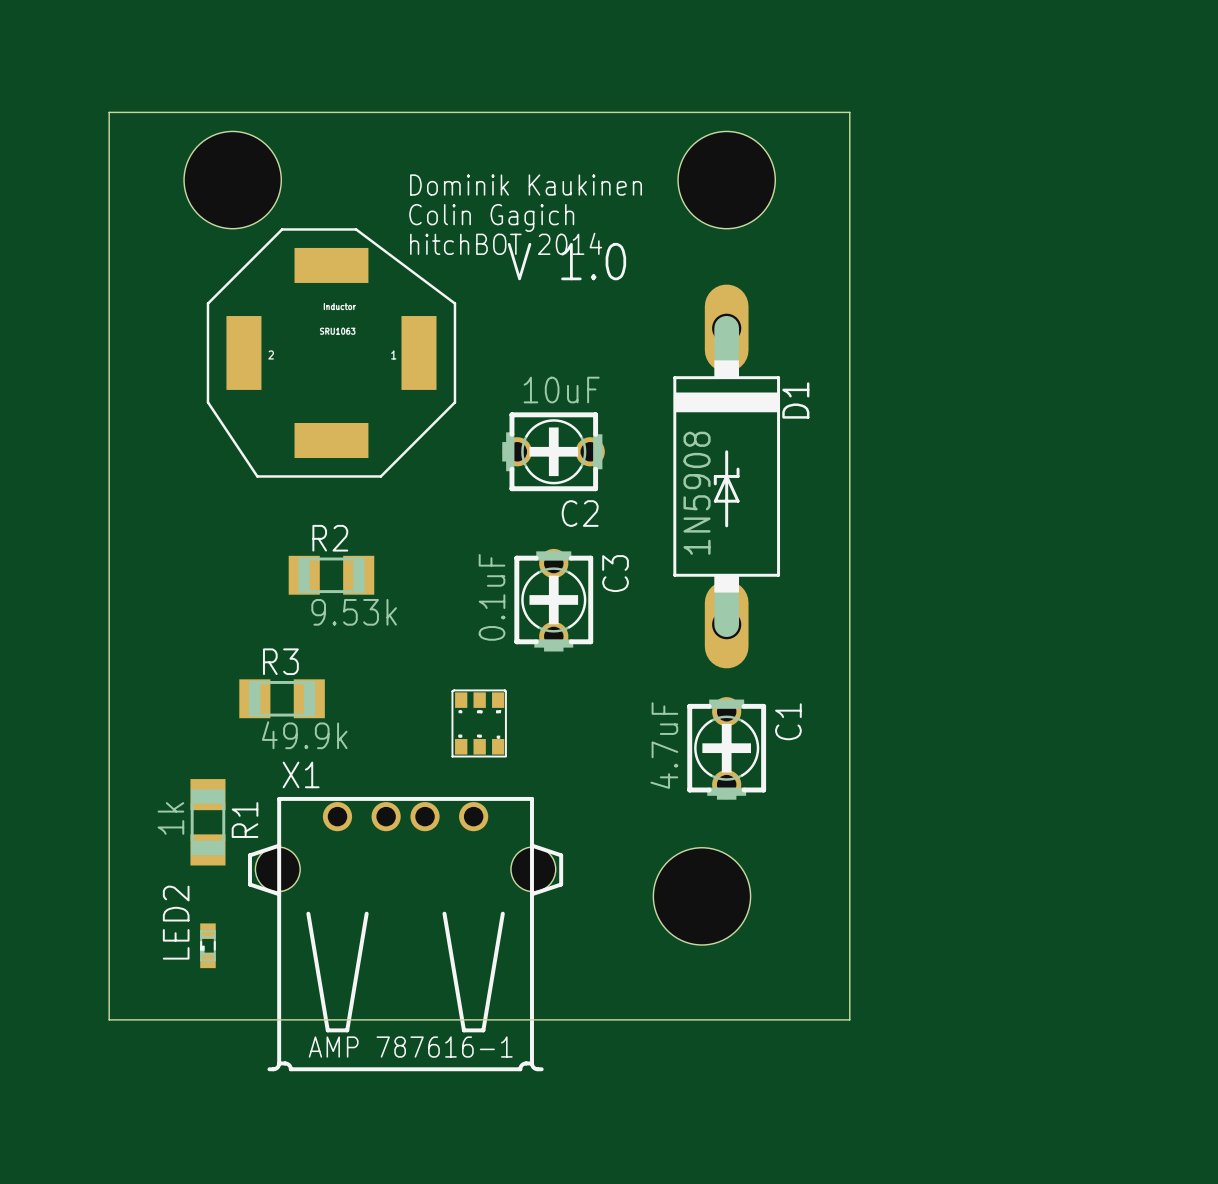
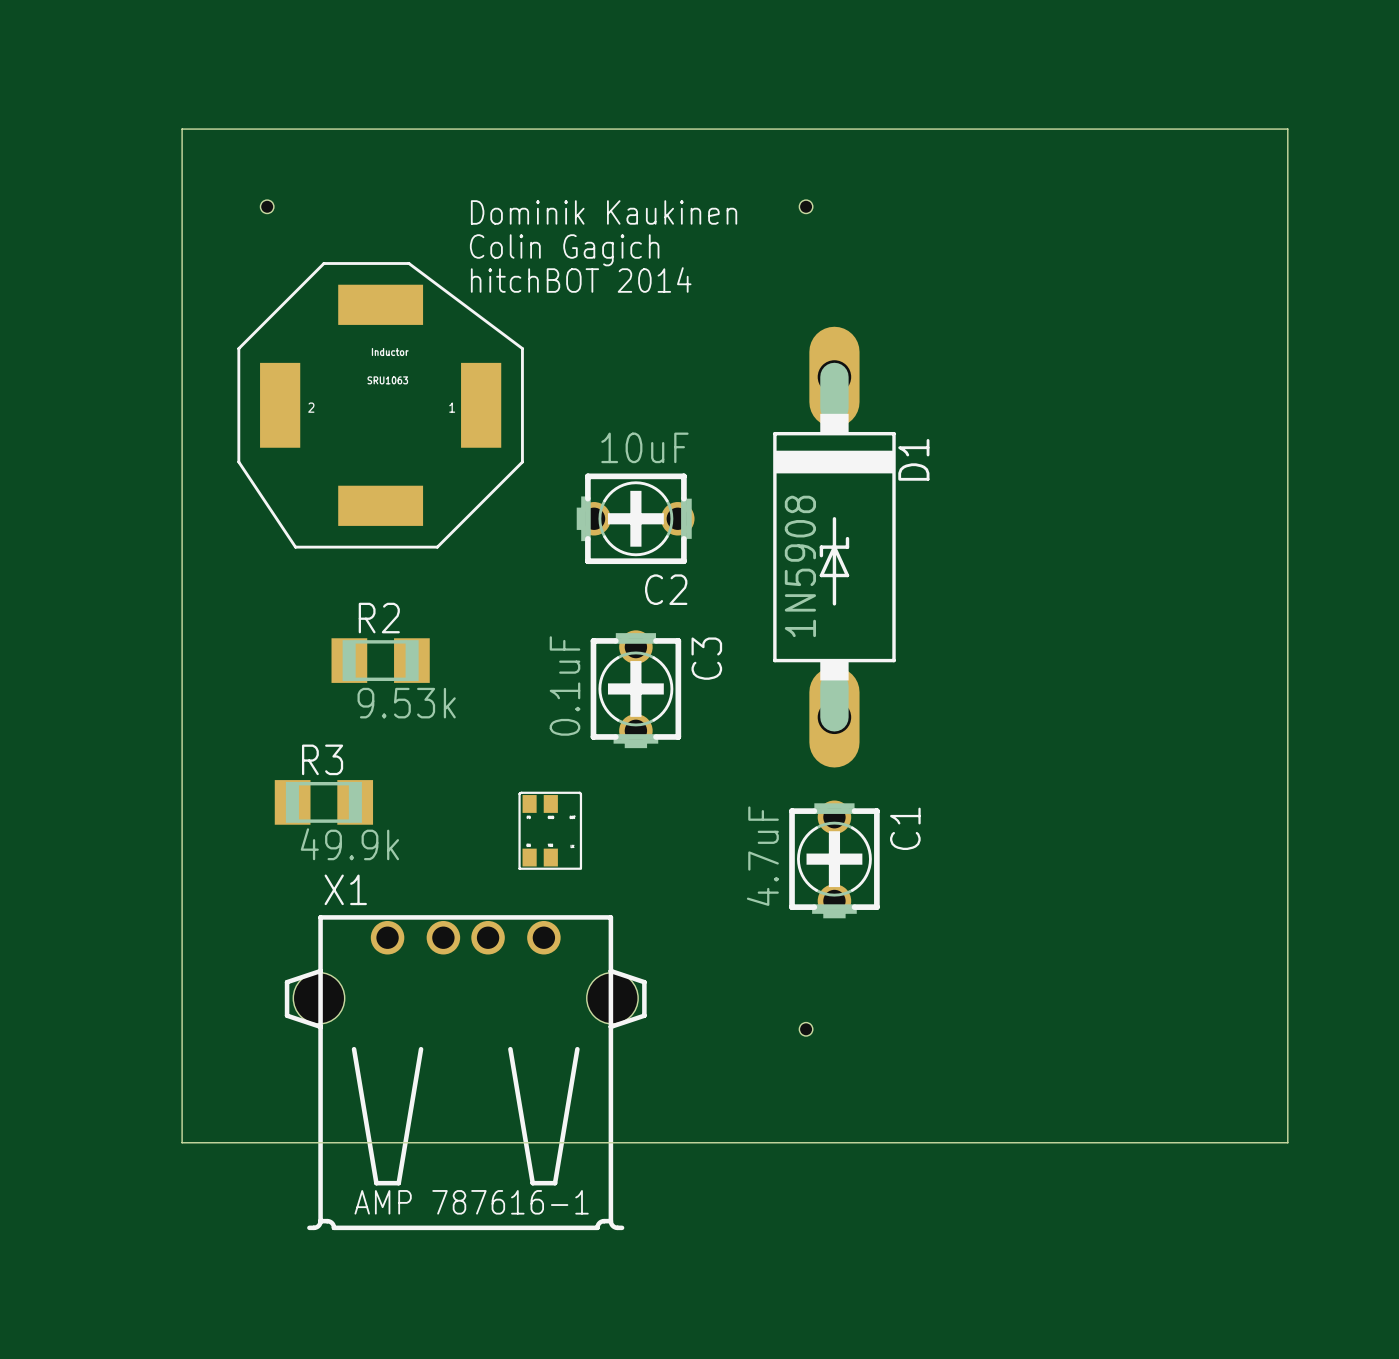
board edge: (158, 112) (109, 112) (109, 1019) (849, 1019) (849, 112) -> (182, 129) (182, 1142) (1287, 1142) (1287, 129) (975, 129)
hole size: [184, 131, 282, 229] -> [260, 200, 274, 214]
hole: none -> (806, 206)
hole: (726, 180) -> none
text: V 1.0 (566, 261) -> none
part footprint: [451, 689, 507, 758] -> [518, 791, 583, 870]
R1: 1k (207, 822) -> none
hole size: [653, 847, 751, 945] -> [799, 1022, 813, 1037]
LED2: (207, 945) -> none

